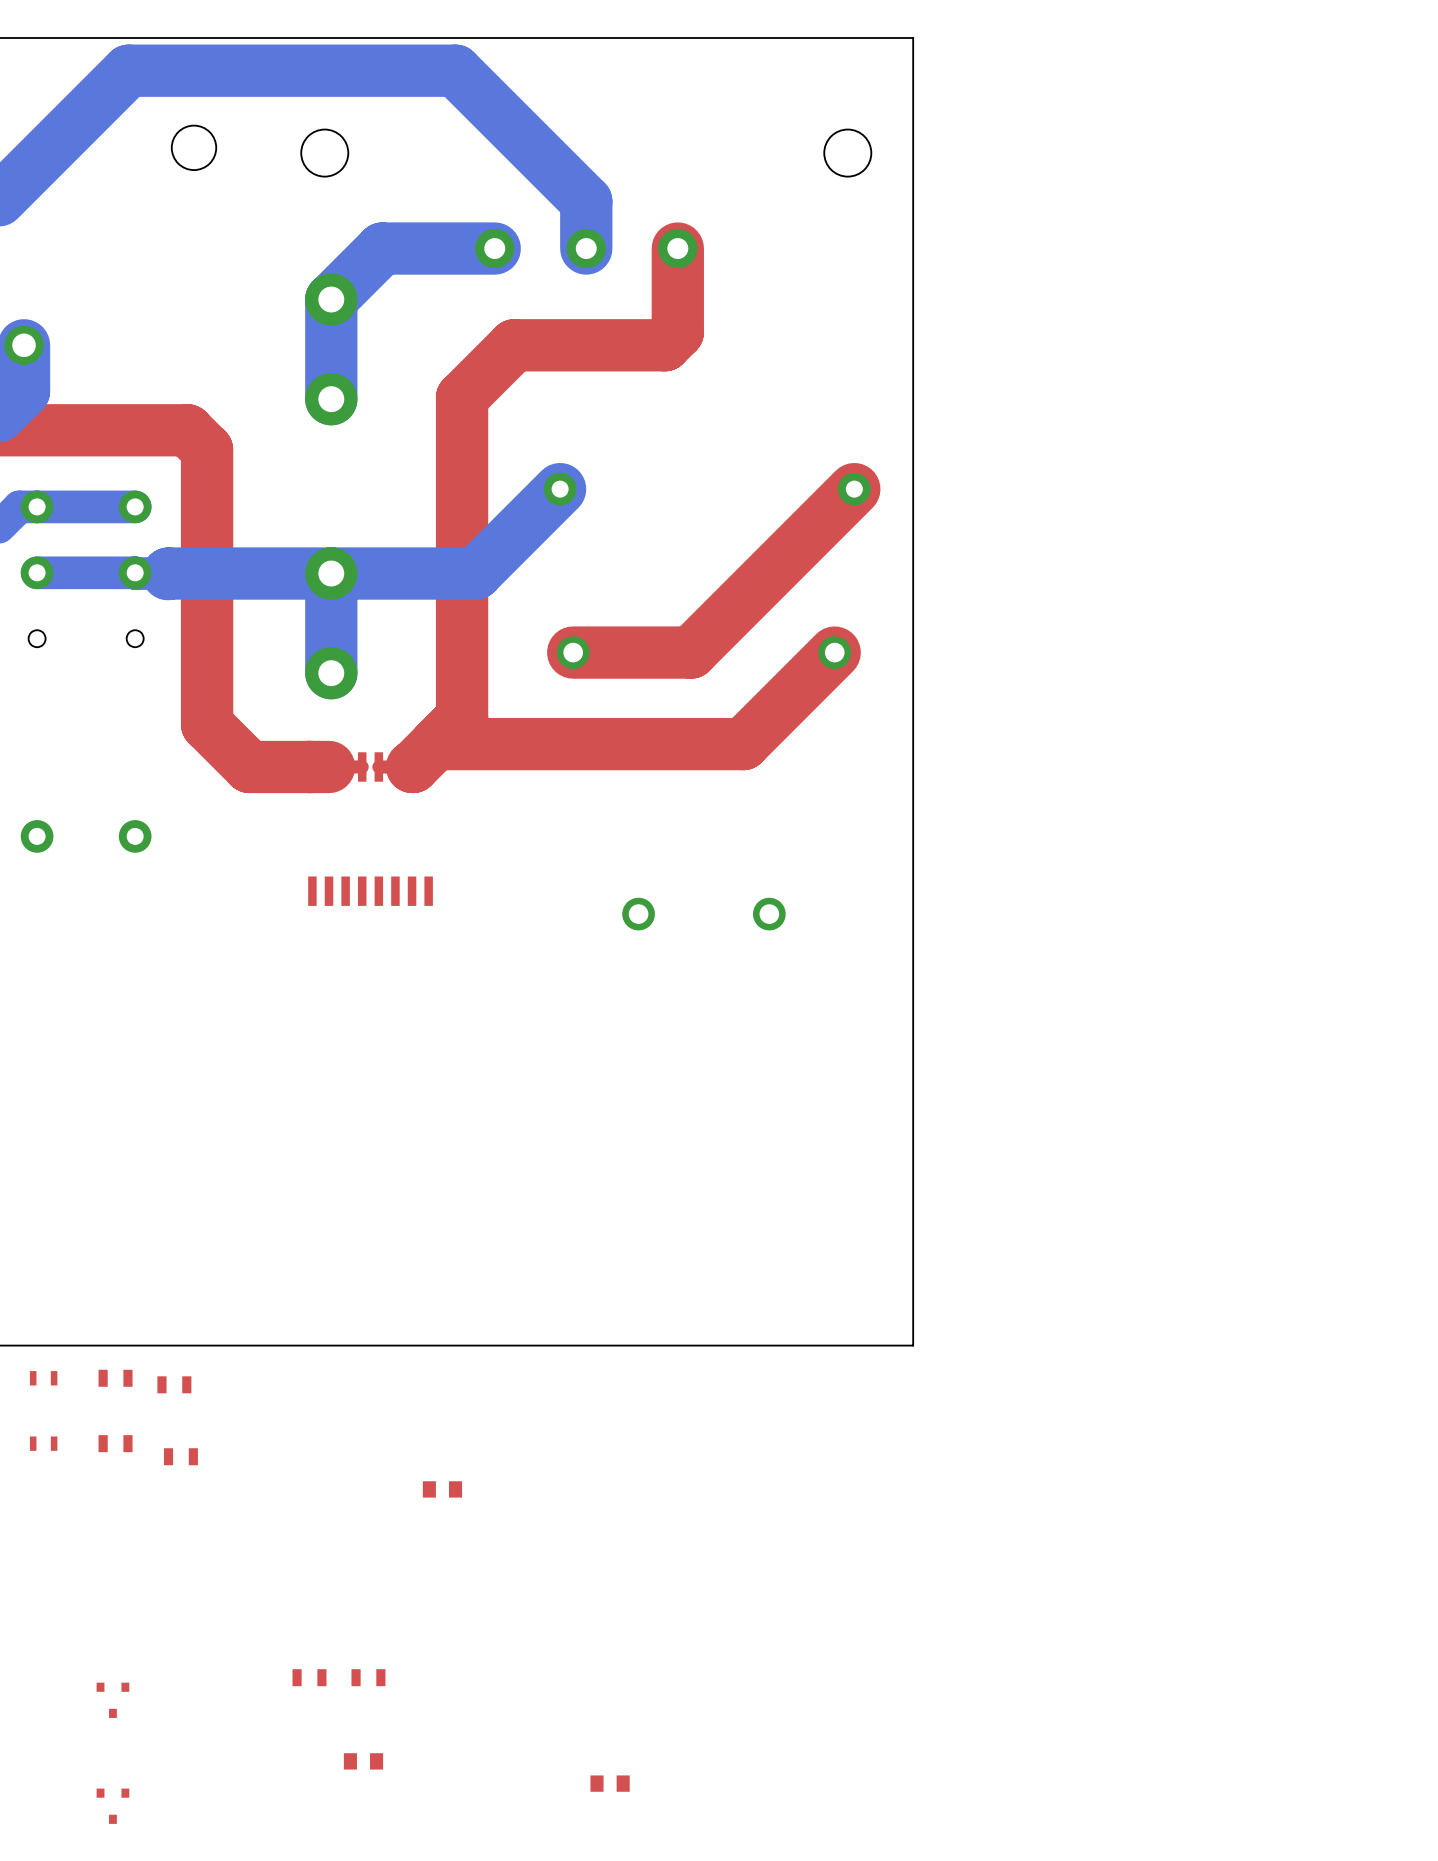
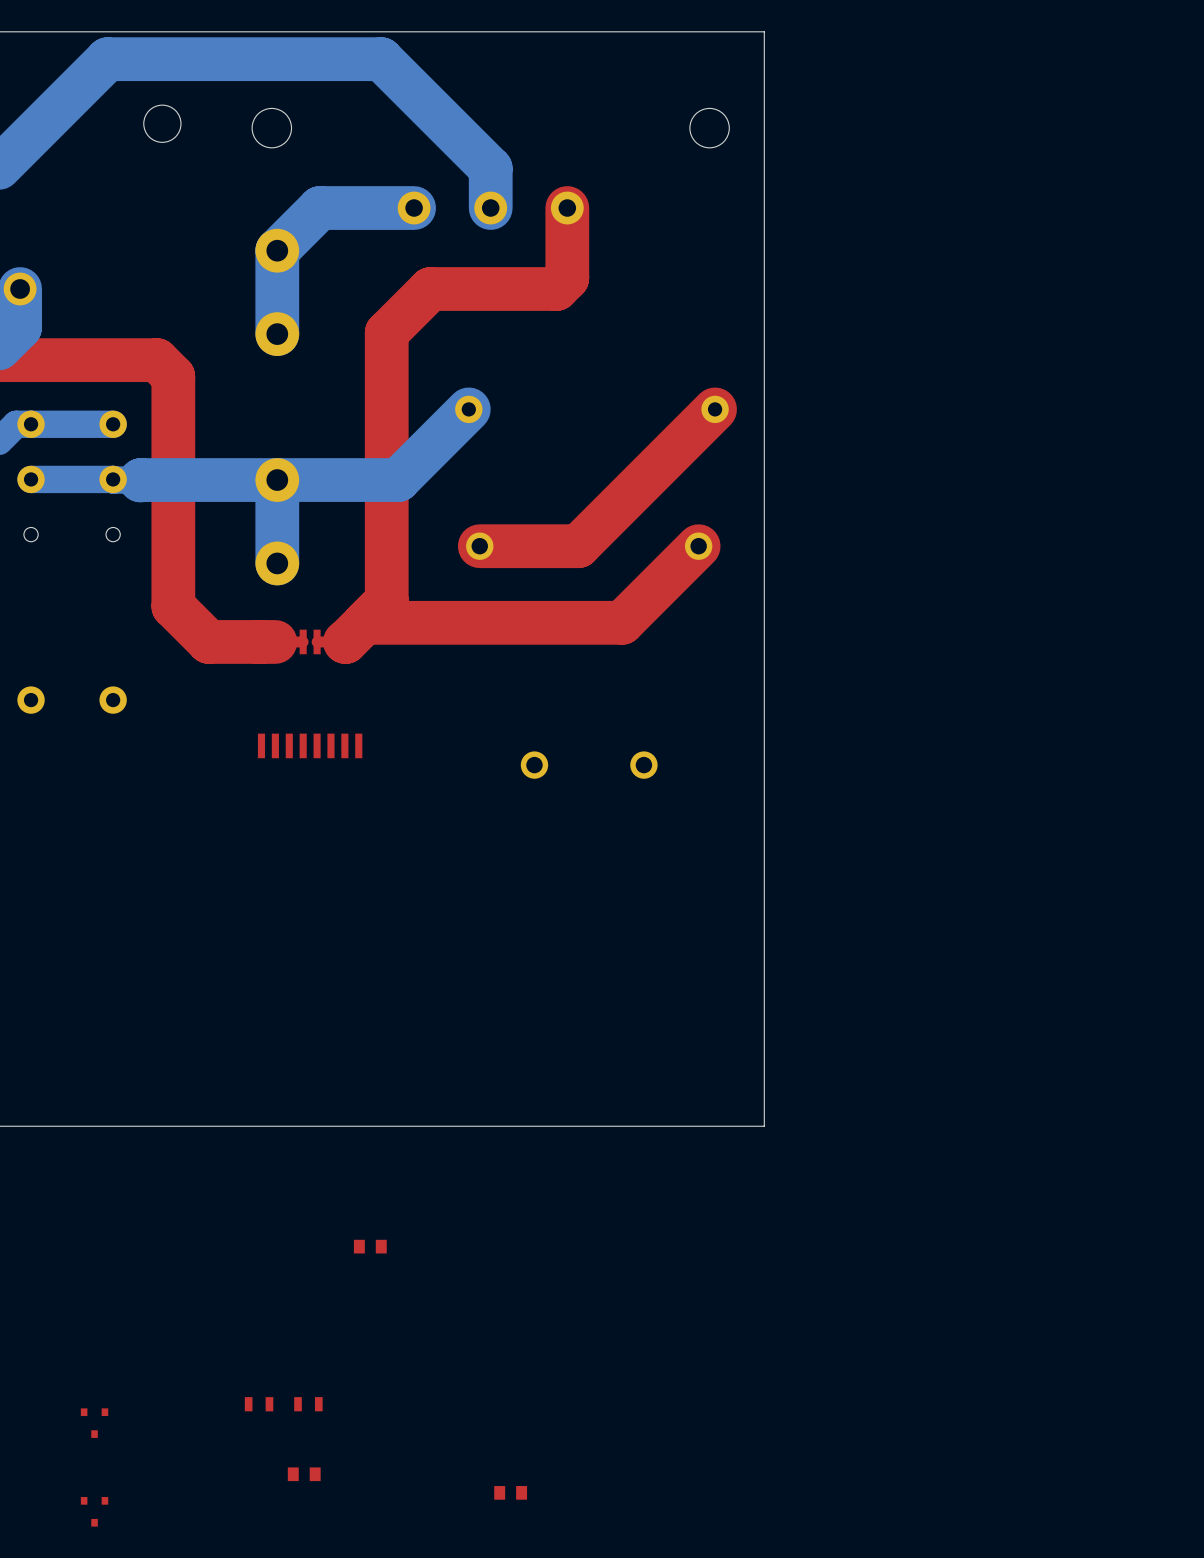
part: (43, 1378) -> none
part: (115, 1378) -> none
part: (174, 1384) -> none
part: (43, 1443) -> none
part: (115, 1443) -> none
part: (180, 1456) -> none

